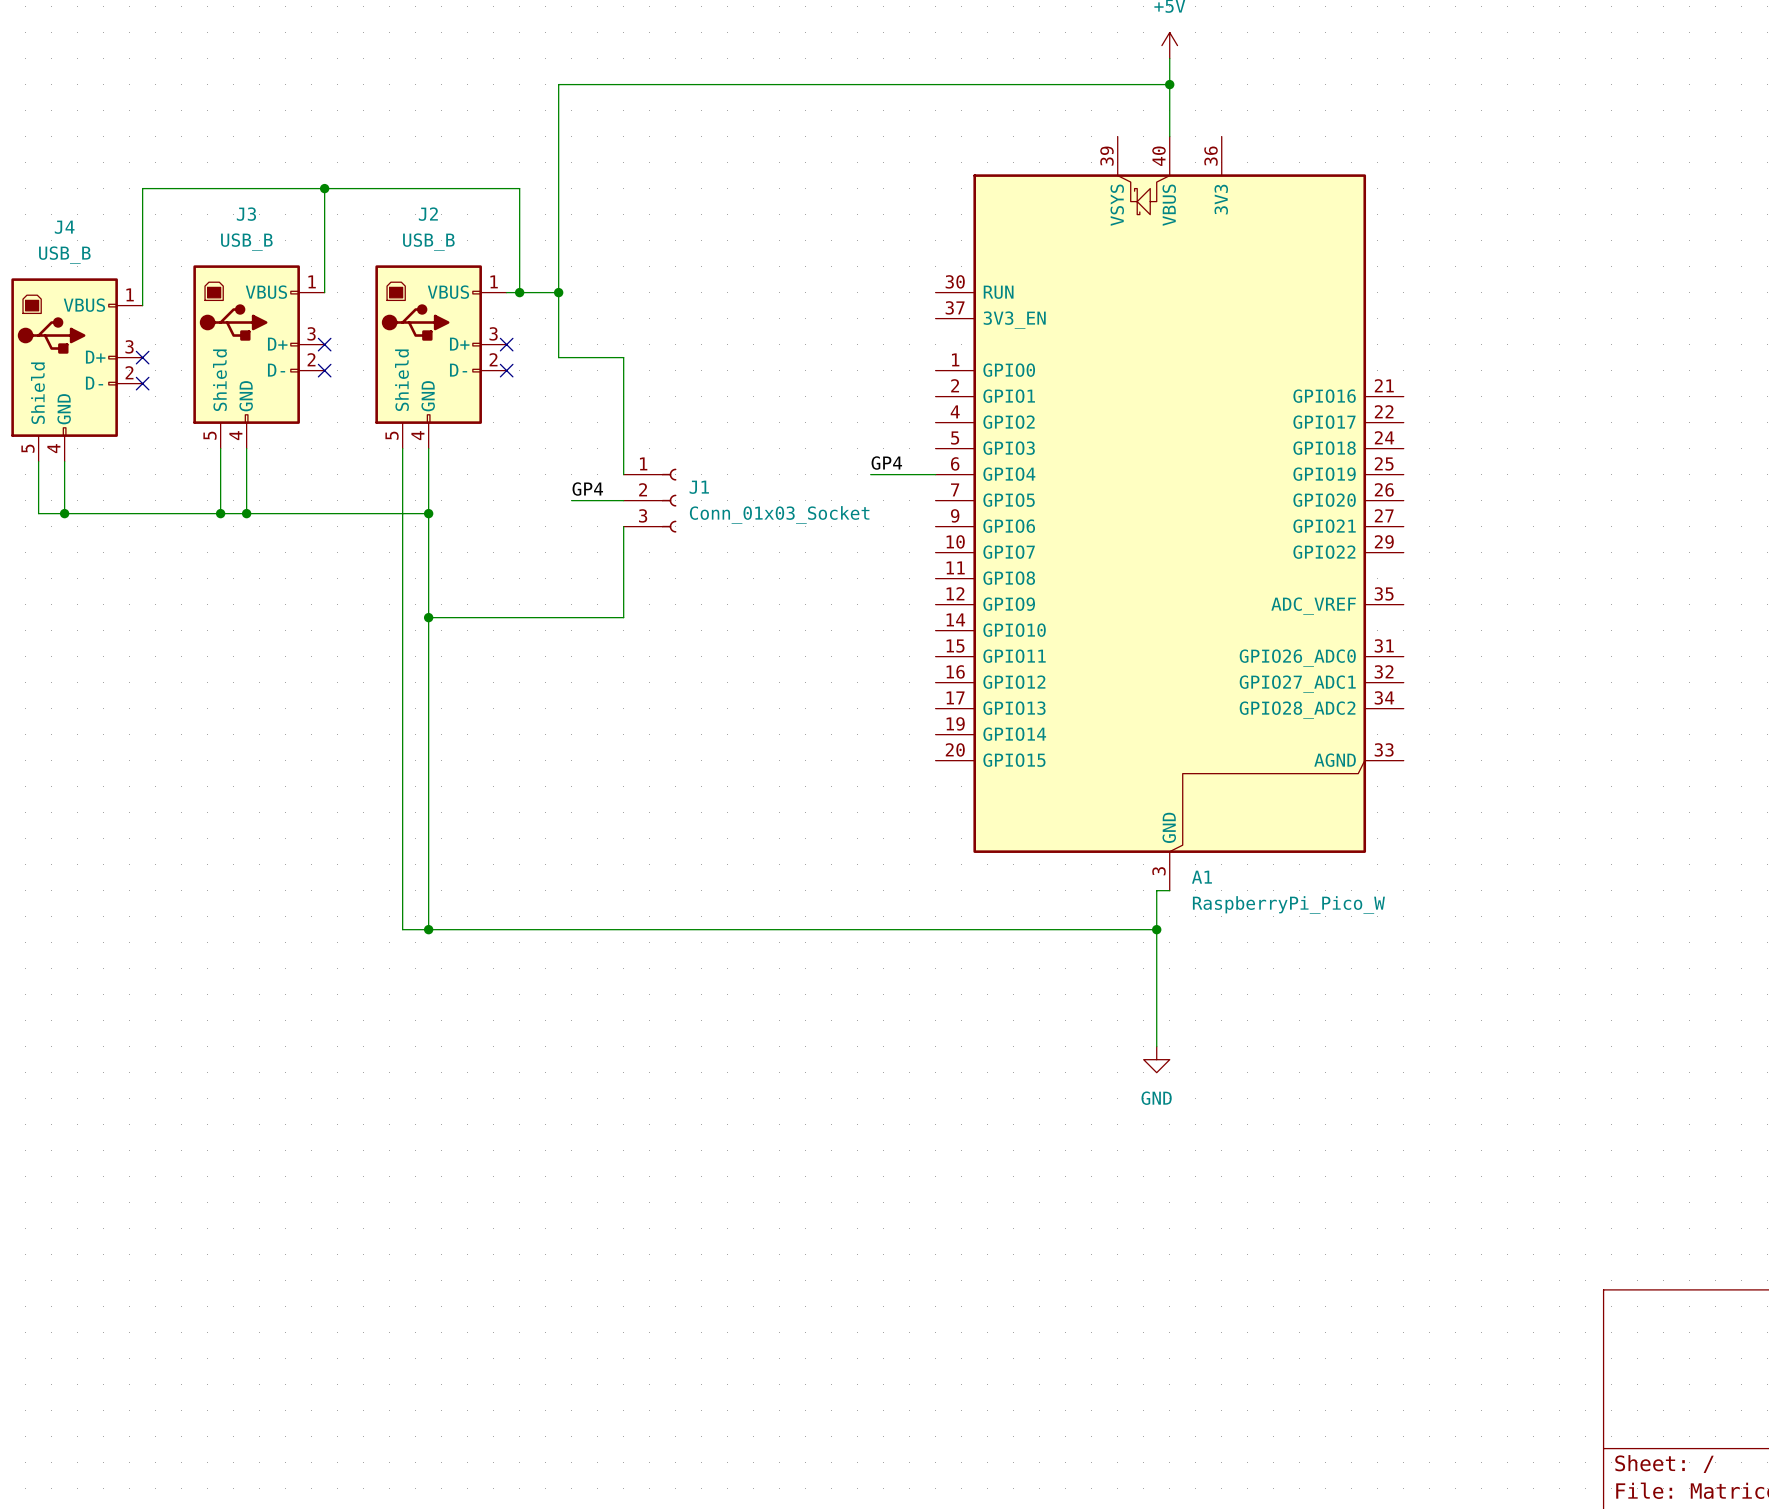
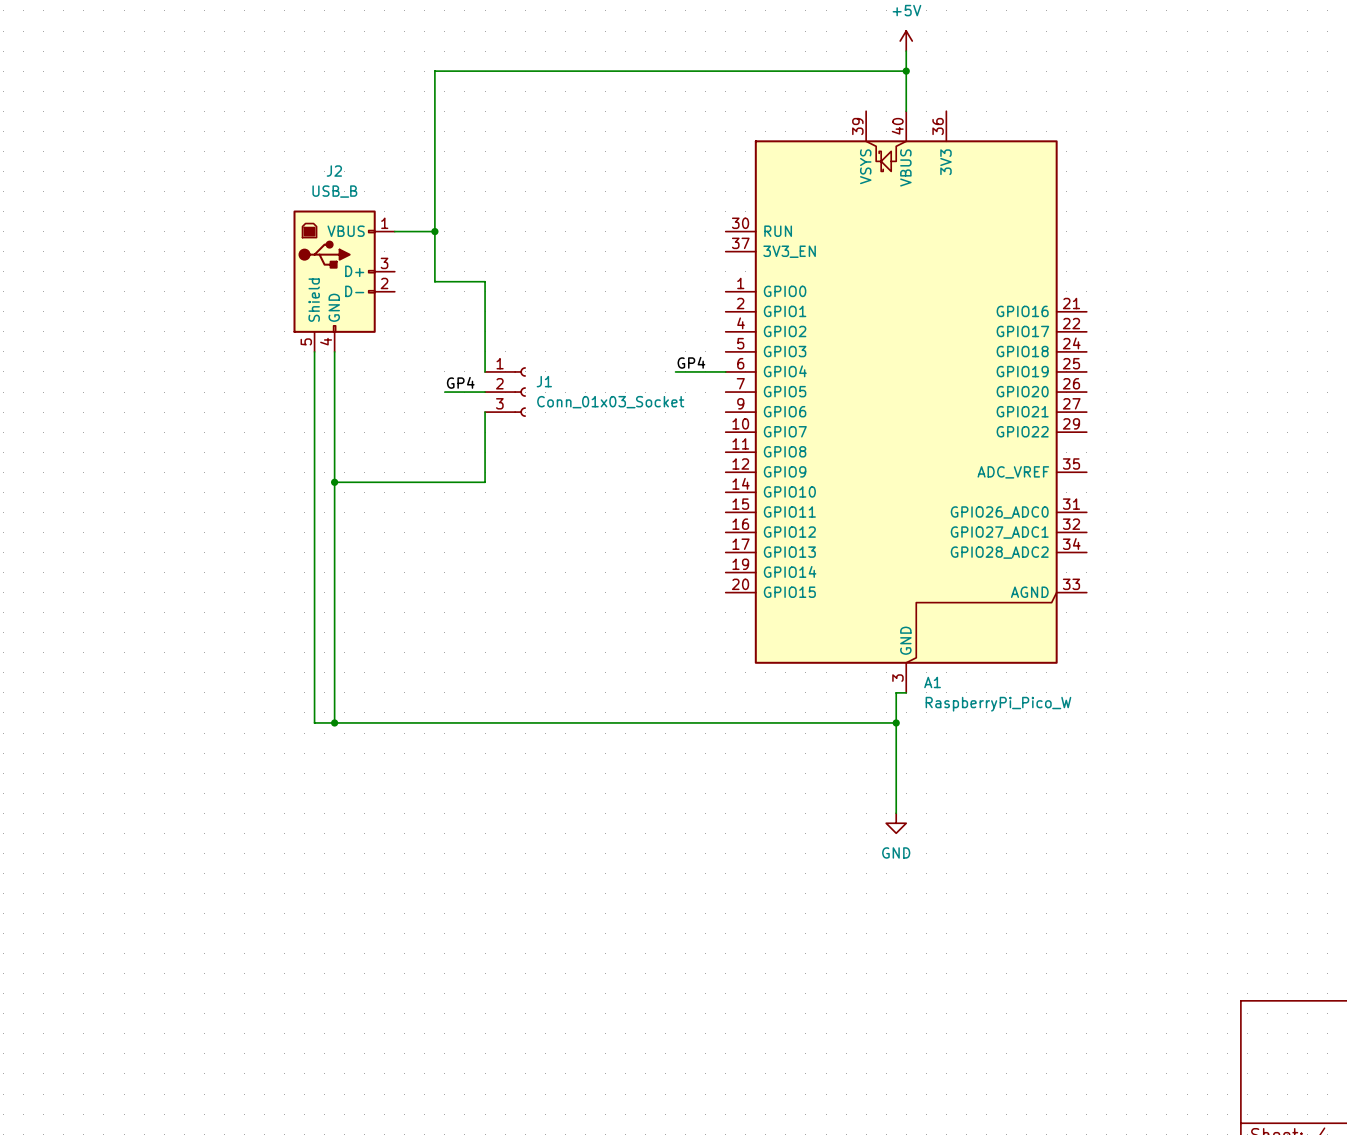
wire: (324, 188) (324, 292) -> none
junction: (324, 188) -> none
wire: (519, 292) (519, 188) (142, 188) (142, 305) -> none
junction: (519, 292) -> none
no-connect mark: (324, 344) -> none
no-connect mark: (506, 344) -> none
J3: USB_B (258, 356) -> none
no-connect mark: (142, 357) -> none
J4: USB_B (76, 369) -> none
no-connect mark: (324, 370) -> none
no-connect mark: (506, 370) -> none
no-connect mark: (142, 383) -> none
wire: (220, 448) (220, 513) -> none
wire: (246, 448) (246, 513) -> none
wire: (38, 461) (38, 513) (428, 513) -> none
wire: (64, 461) (64, 513) -> none
junction: (64, 513) -> none
junction: (220, 513) -> none
junction: (246, 513) -> none
junction: (428, 513) -> none

